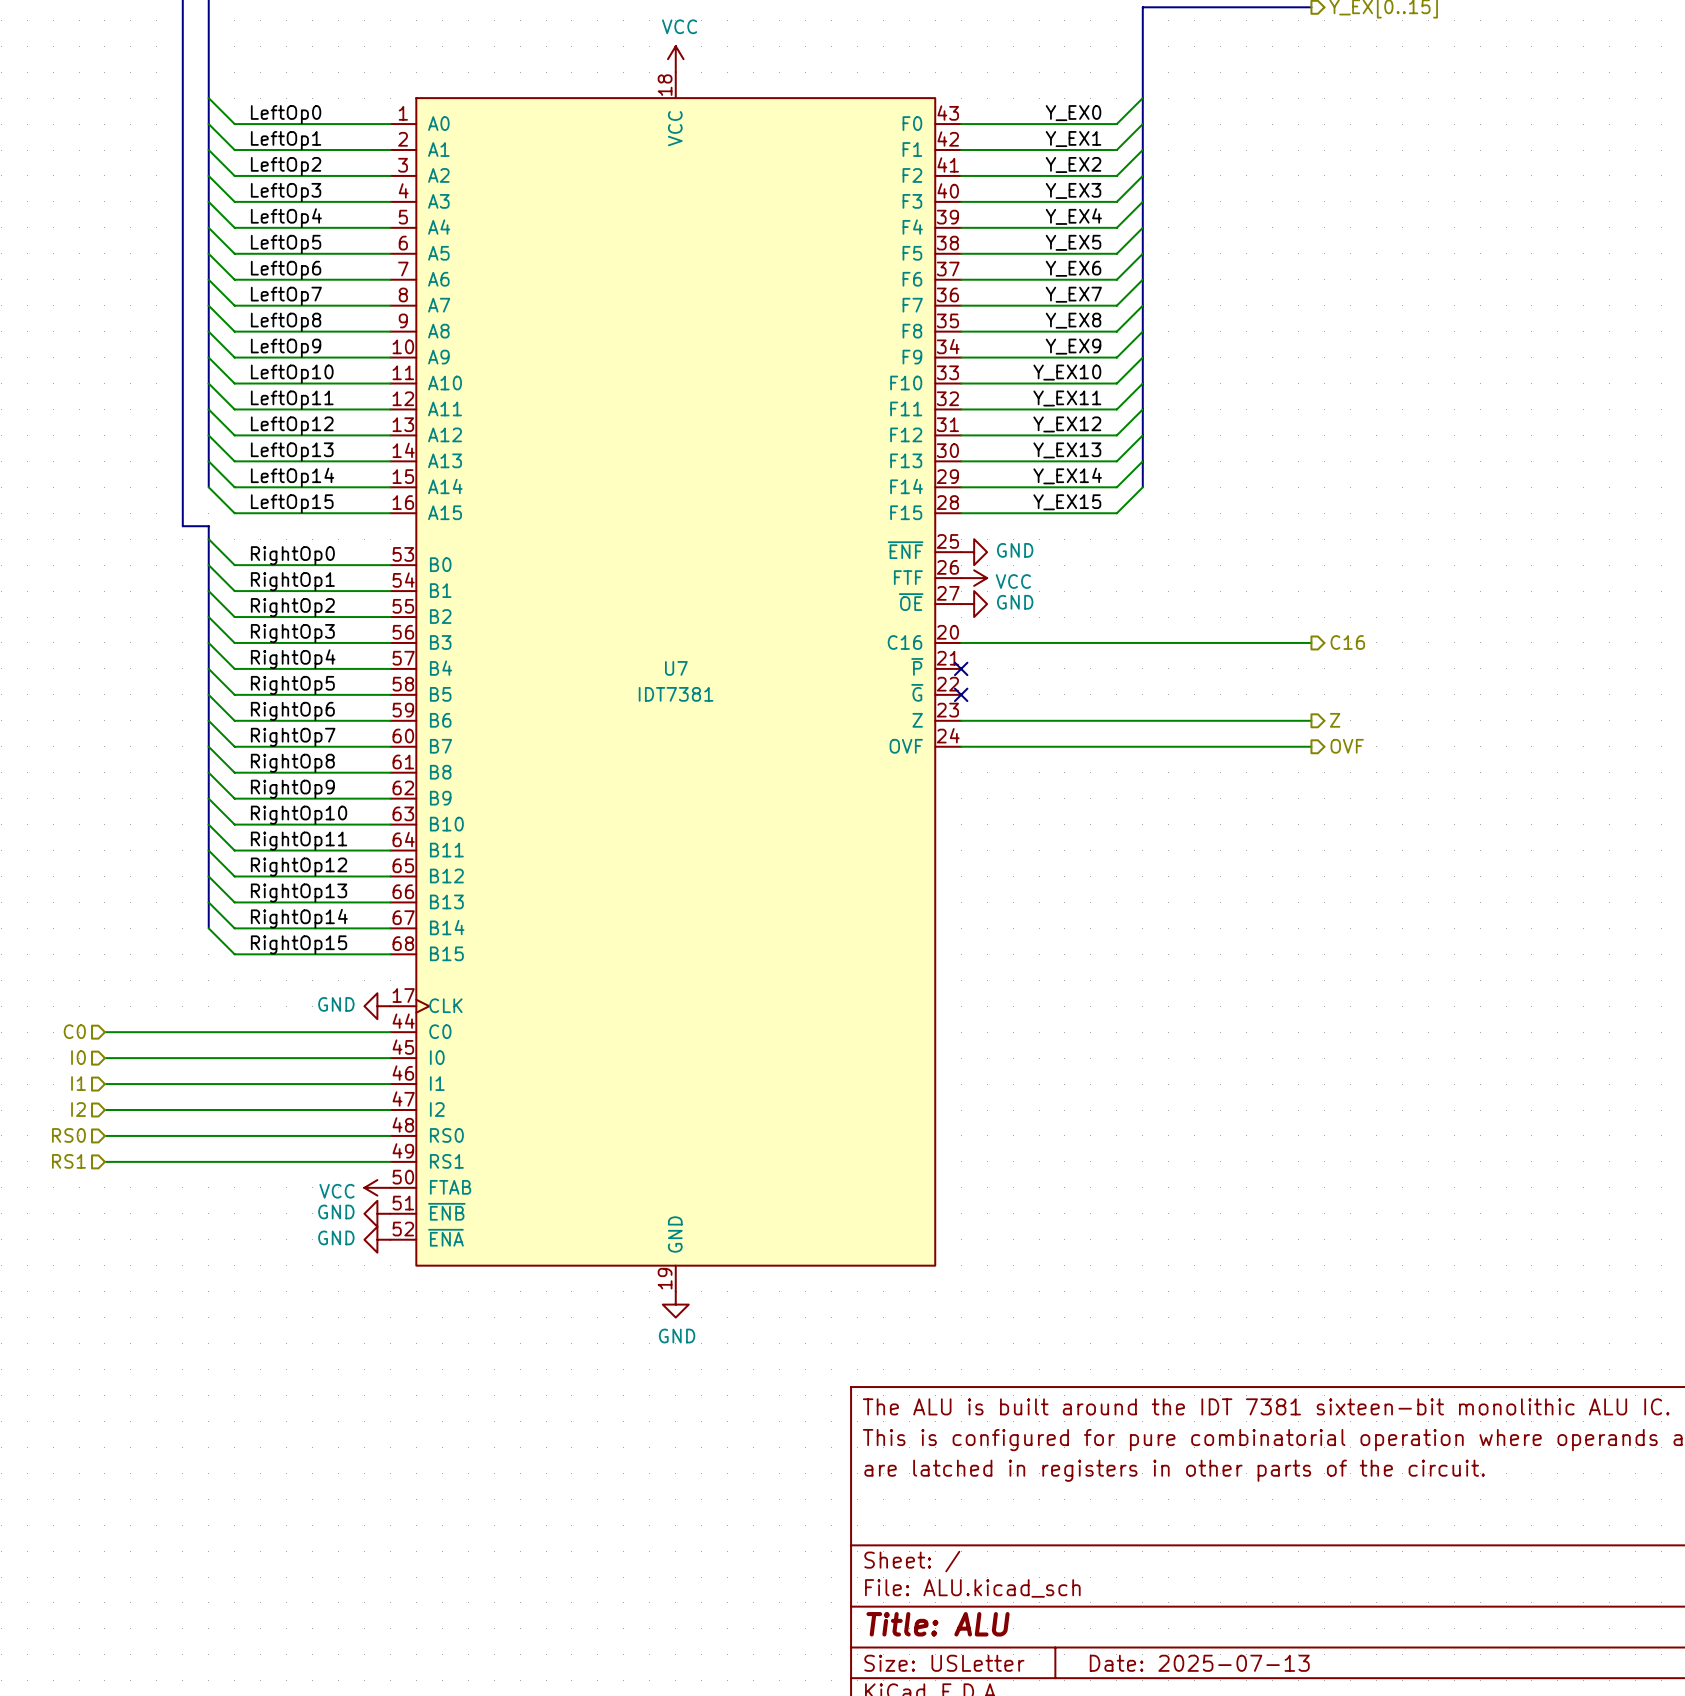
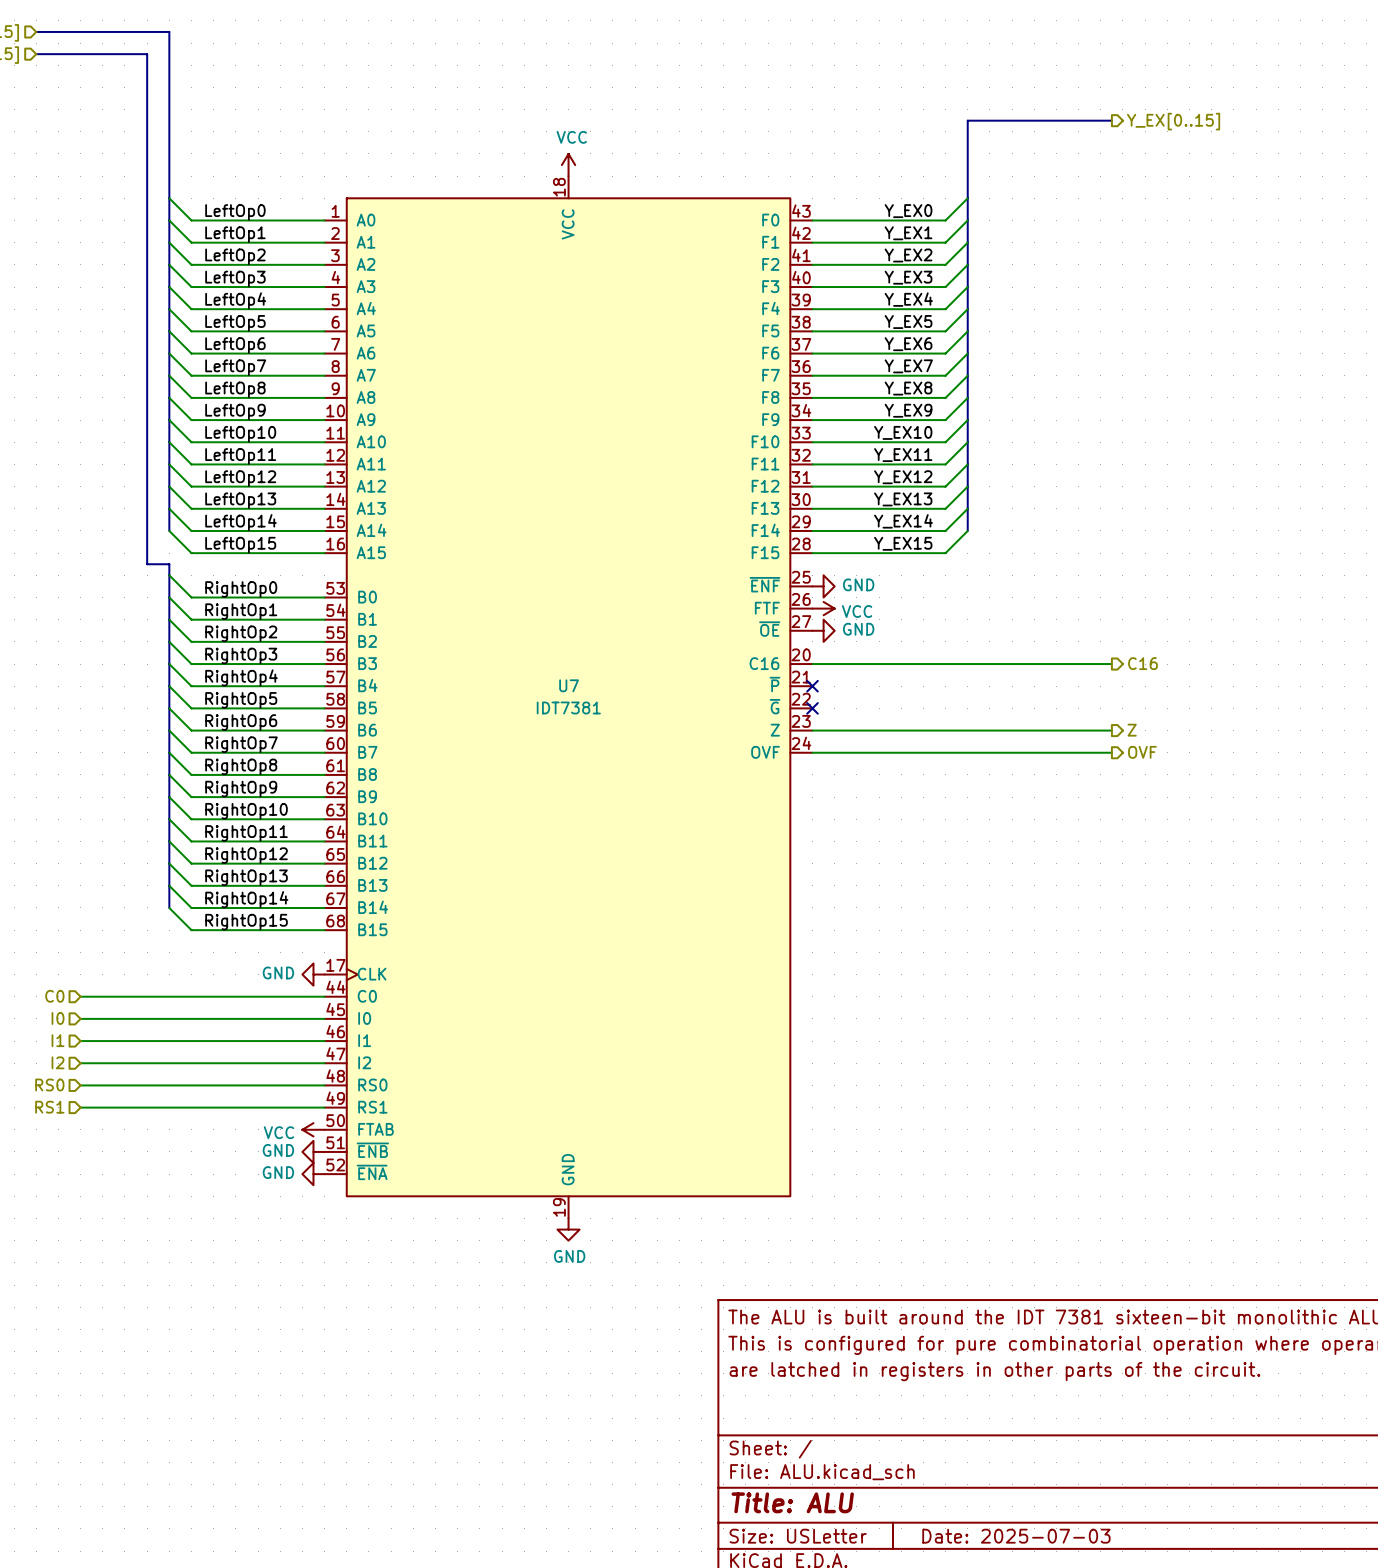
title block: Date: 2025-07-13 (1199, 1663) -> Date: 2025-07-03 (1016, 1536)

